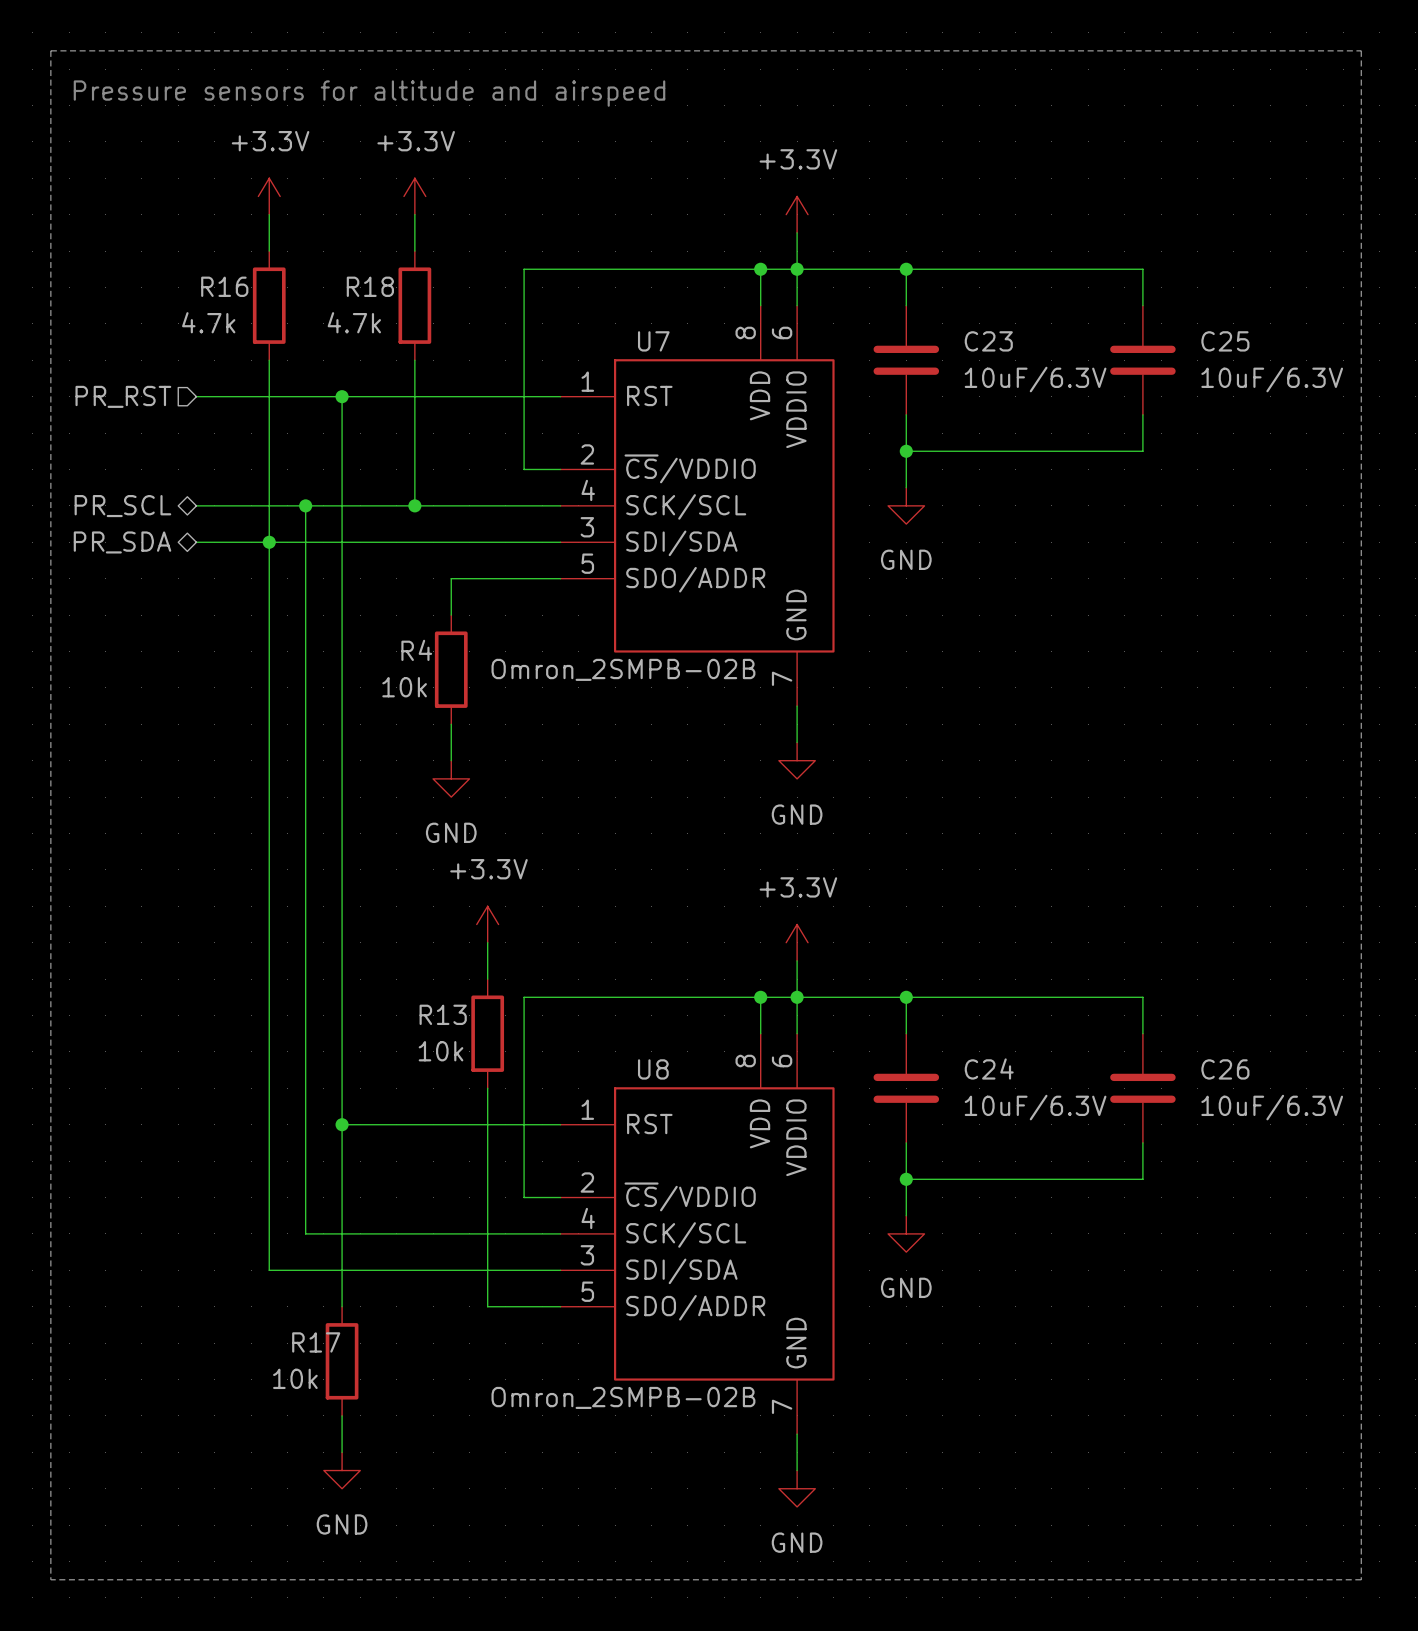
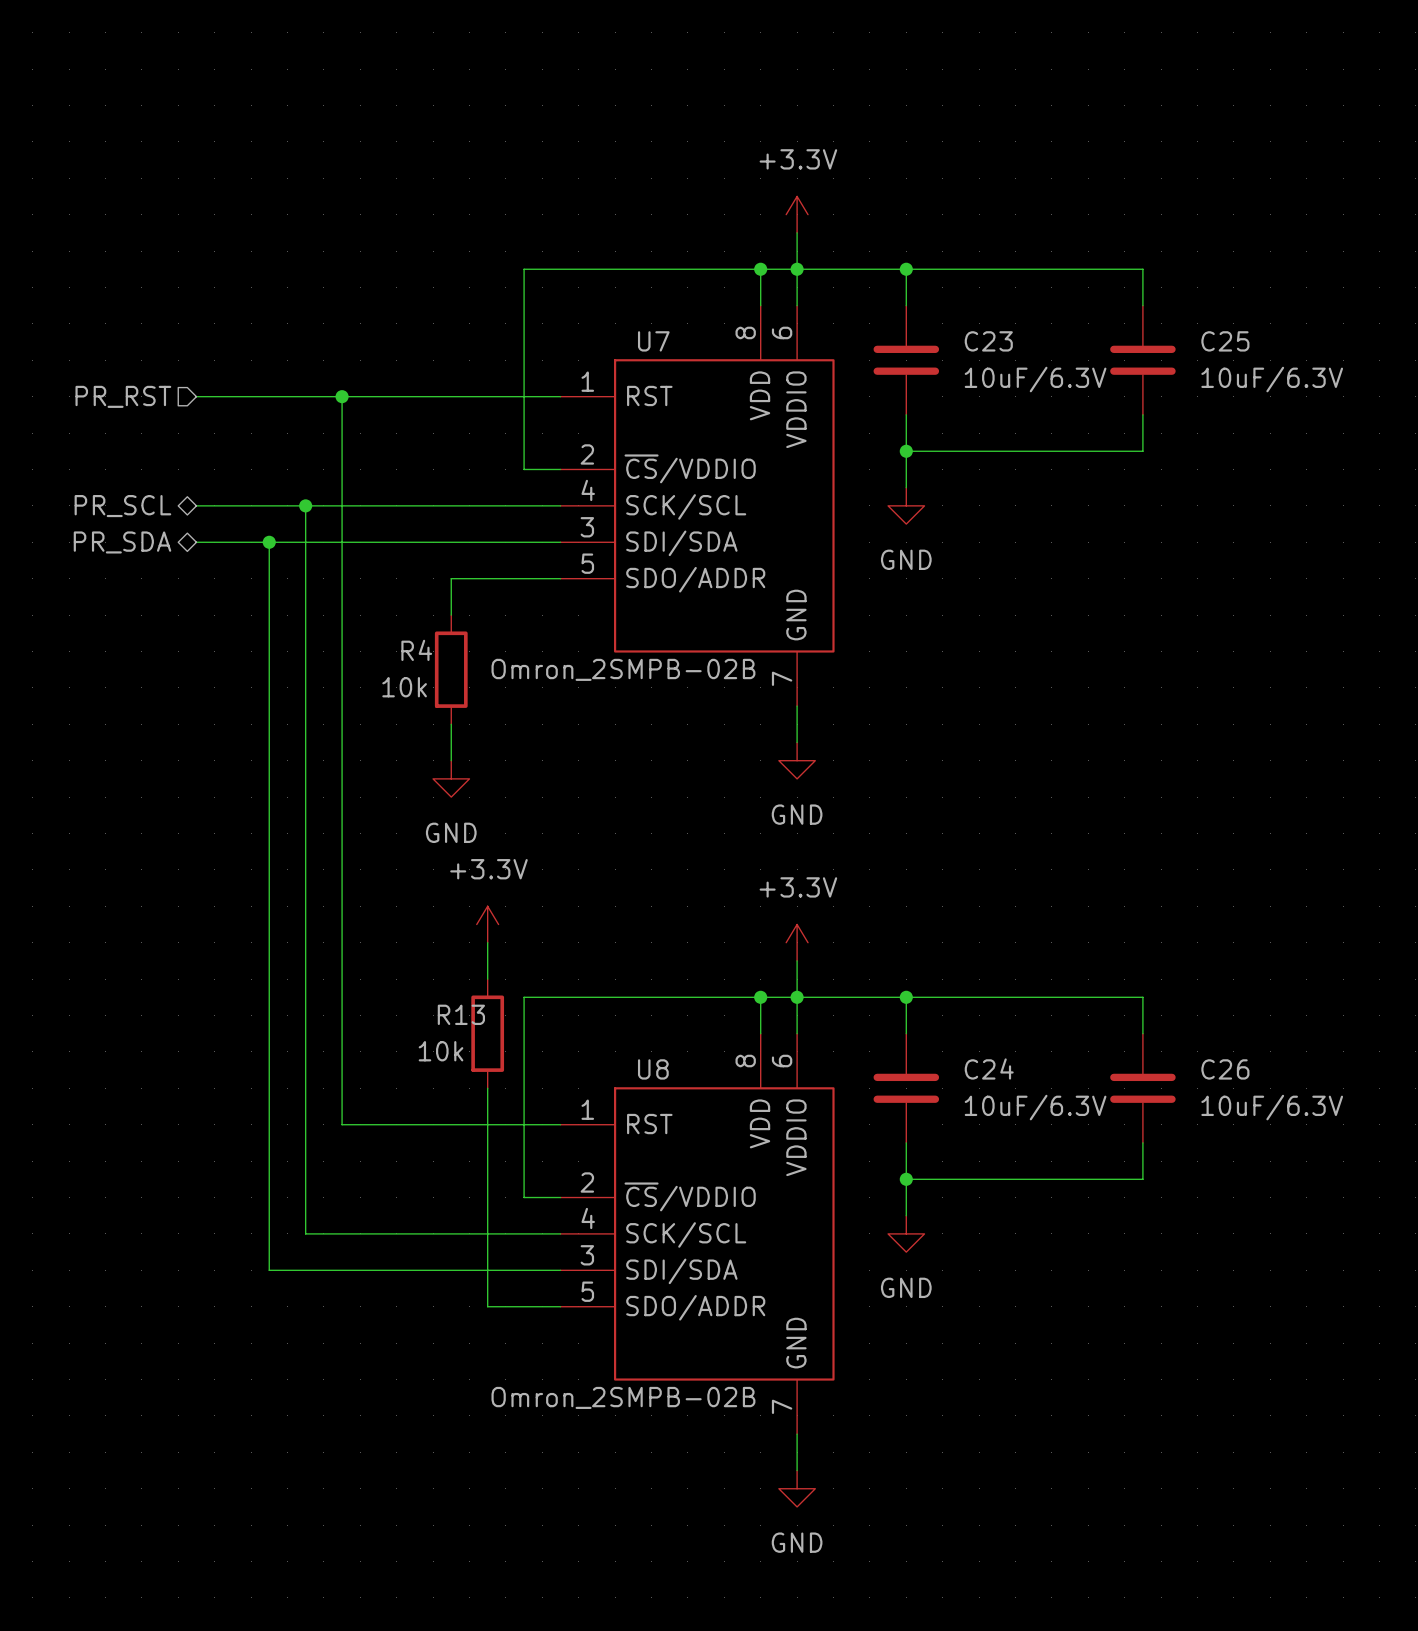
line: (50, 50) (50, 1579) (1361, 1579) (1361, 50) (50, 50) -> none
text: Pressure sensors for altitude and airspeed (369, 93) -> none
power symbol: +3.3V (269, 196) -> none
power symbol: +3.3V (414, 196) -> none
wire: (269, 214) (269, 251) -> none
wire: (414, 214) (414, 251) -> none
R16: 4.7k (269, 305) -> none
R18: 4.7k (414, 305) -> none
wire: (269, 360) (269, 542) -> none
wire: (414, 360) (414, 505) -> none
junction: (414, 505) -> none
R13 name position: R13 (443, 1014) -> R13 (461, 1014)
wire: (342, 1124) (342, 1306) -> none
junction: (342, 1124) -> none
R17: 10k (342, 1361) -> none
wire: (342, 1415) (342, 1452) -> none
power symbol: GND (342, 1470) -> none

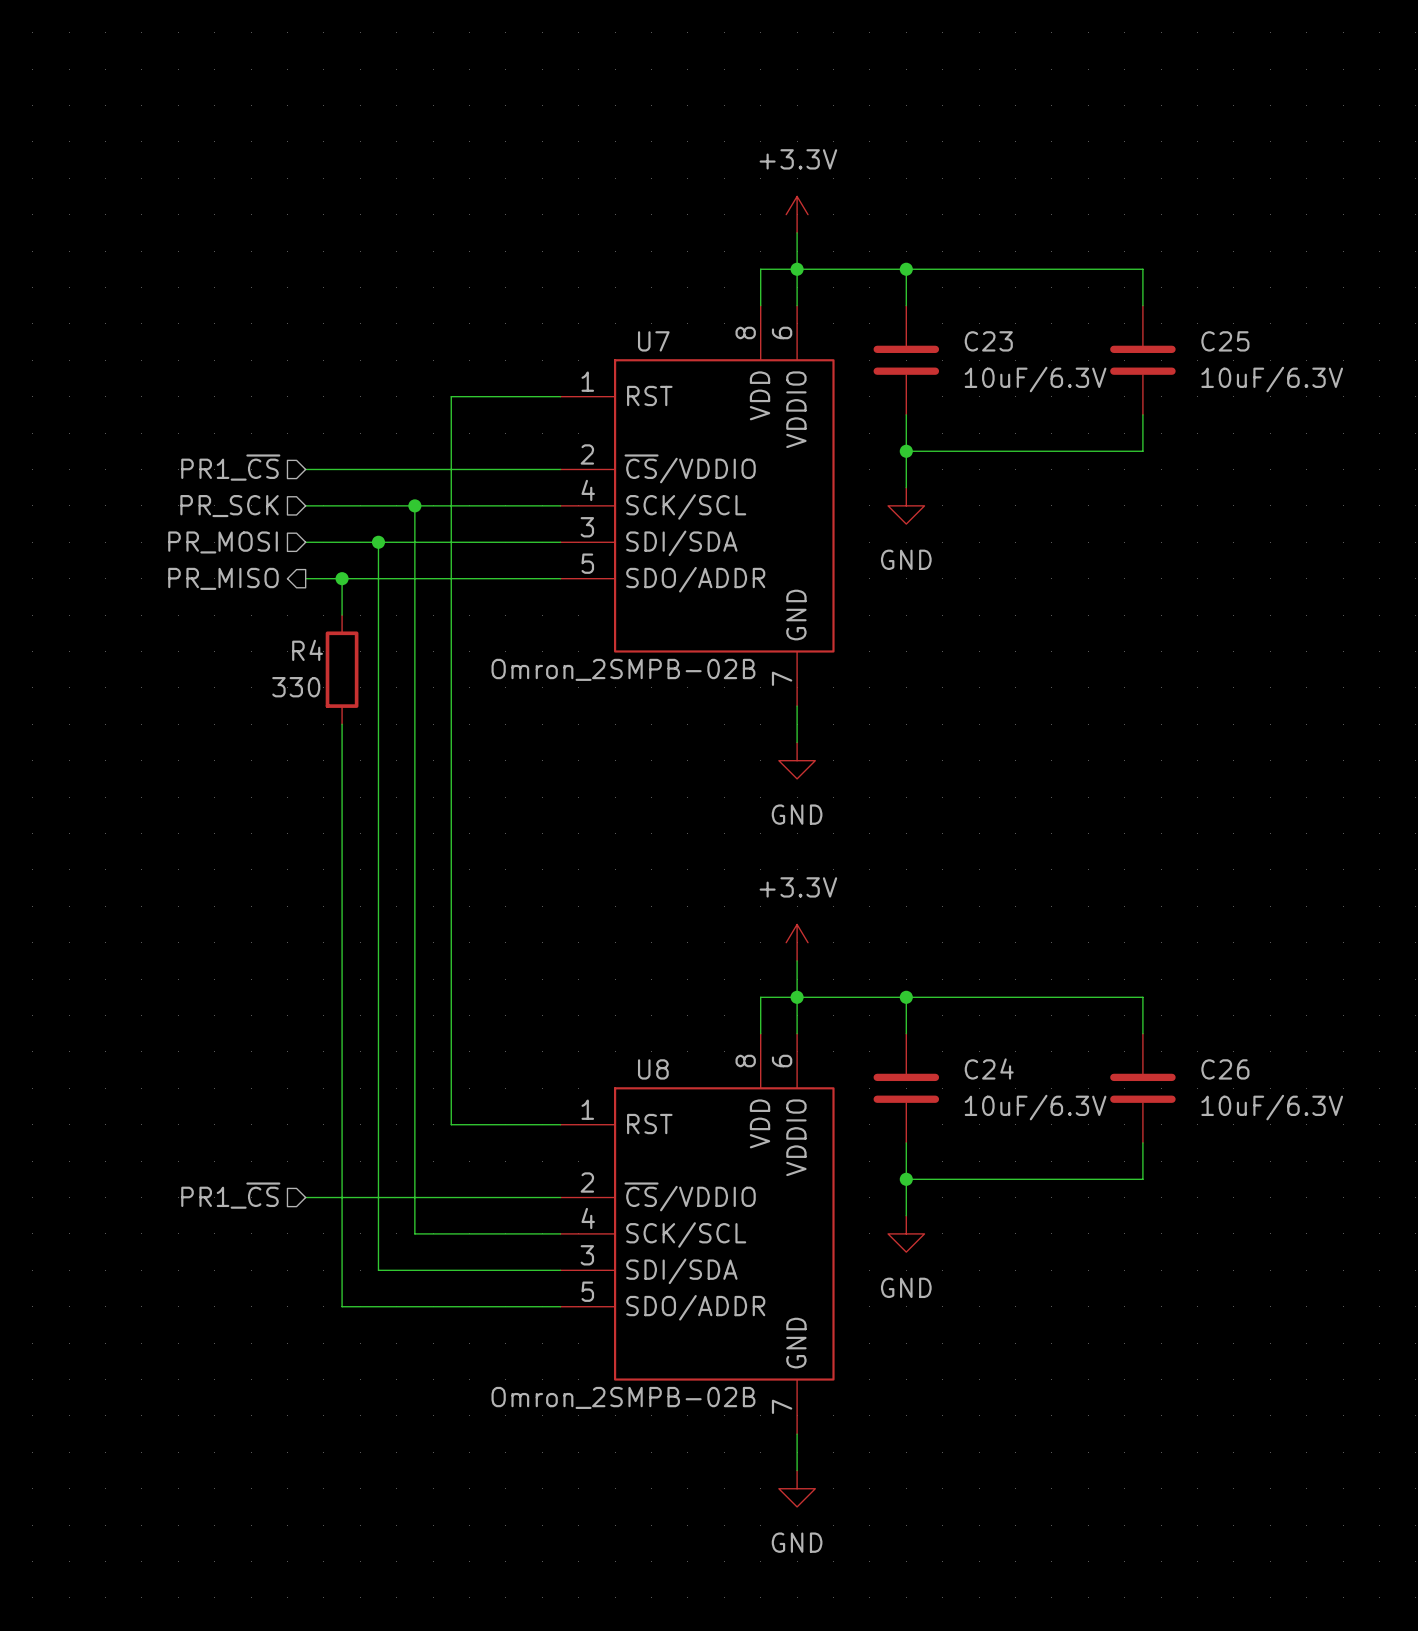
wire: (760, 269) (524, 269) (524, 469) -> (305, 469) (524, 469)
junction: (760, 269) -> none
hierarchical label: PR_RST (123, 396) -> none
wire: (196, 396) (451, 396) -> (305, 578) (451, 578) (451, 396)
wire: (342, 396) (342, 578) -> none
junction: (342, 396) -> none
hierarchical label: none -> PR1_~{CS} (230, 467)
wire: (196, 505) (305, 505) (305, 1233) (414, 1233) -> (414, 505) (414, 1233)
junction: (305, 505) -> none
junction: none -> (414, 505)
hierarchical label: PR_SCL (122, 506) -> none
hierarchical label: none -> PR_SCK (229, 506)
hierarchical label: PR_SDA (122, 542) -> none
wire: (196, 542) (305, 542) -> none
hierarchical label: none -> PR_MOSI (223, 542)
wire: (269, 542) (269, 1270) (378, 1270) -> (378, 542) (378, 1270)
junction: (269, 542) -> none
junction: none -> (378, 542)
hierarchical label: none -> PR_MISO (223, 578)
junction: none -> (342, 578)
wire: (342, 615) (342, 724) -> (451, 615) (451, 724)
R4 position: (451, 669) -> (342, 669)
R4 value: 10k (404, 687) -> 330 (296, 687)
power symbol: GND (451, 778) -> none
power symbol: +3.3V (487, 924) -> none
wire: (487, 942) (487, 979) -> none
wire: (760, 997) (524, 997) (524, 1197) -> (305, 1197) (524, 1197)
junction: (760, 997) -> none
R13: 10k (487, 1033) -> none
wire: (487, 1088) (487, 1306) -> (342, 1124) (342, 1306) (487, 1306)
wire: (342, 1124) (451, 1124) -> (451, 760) (451, 1124)
hierarchical label: none -> PR1_~{CS} (230, 1195)

